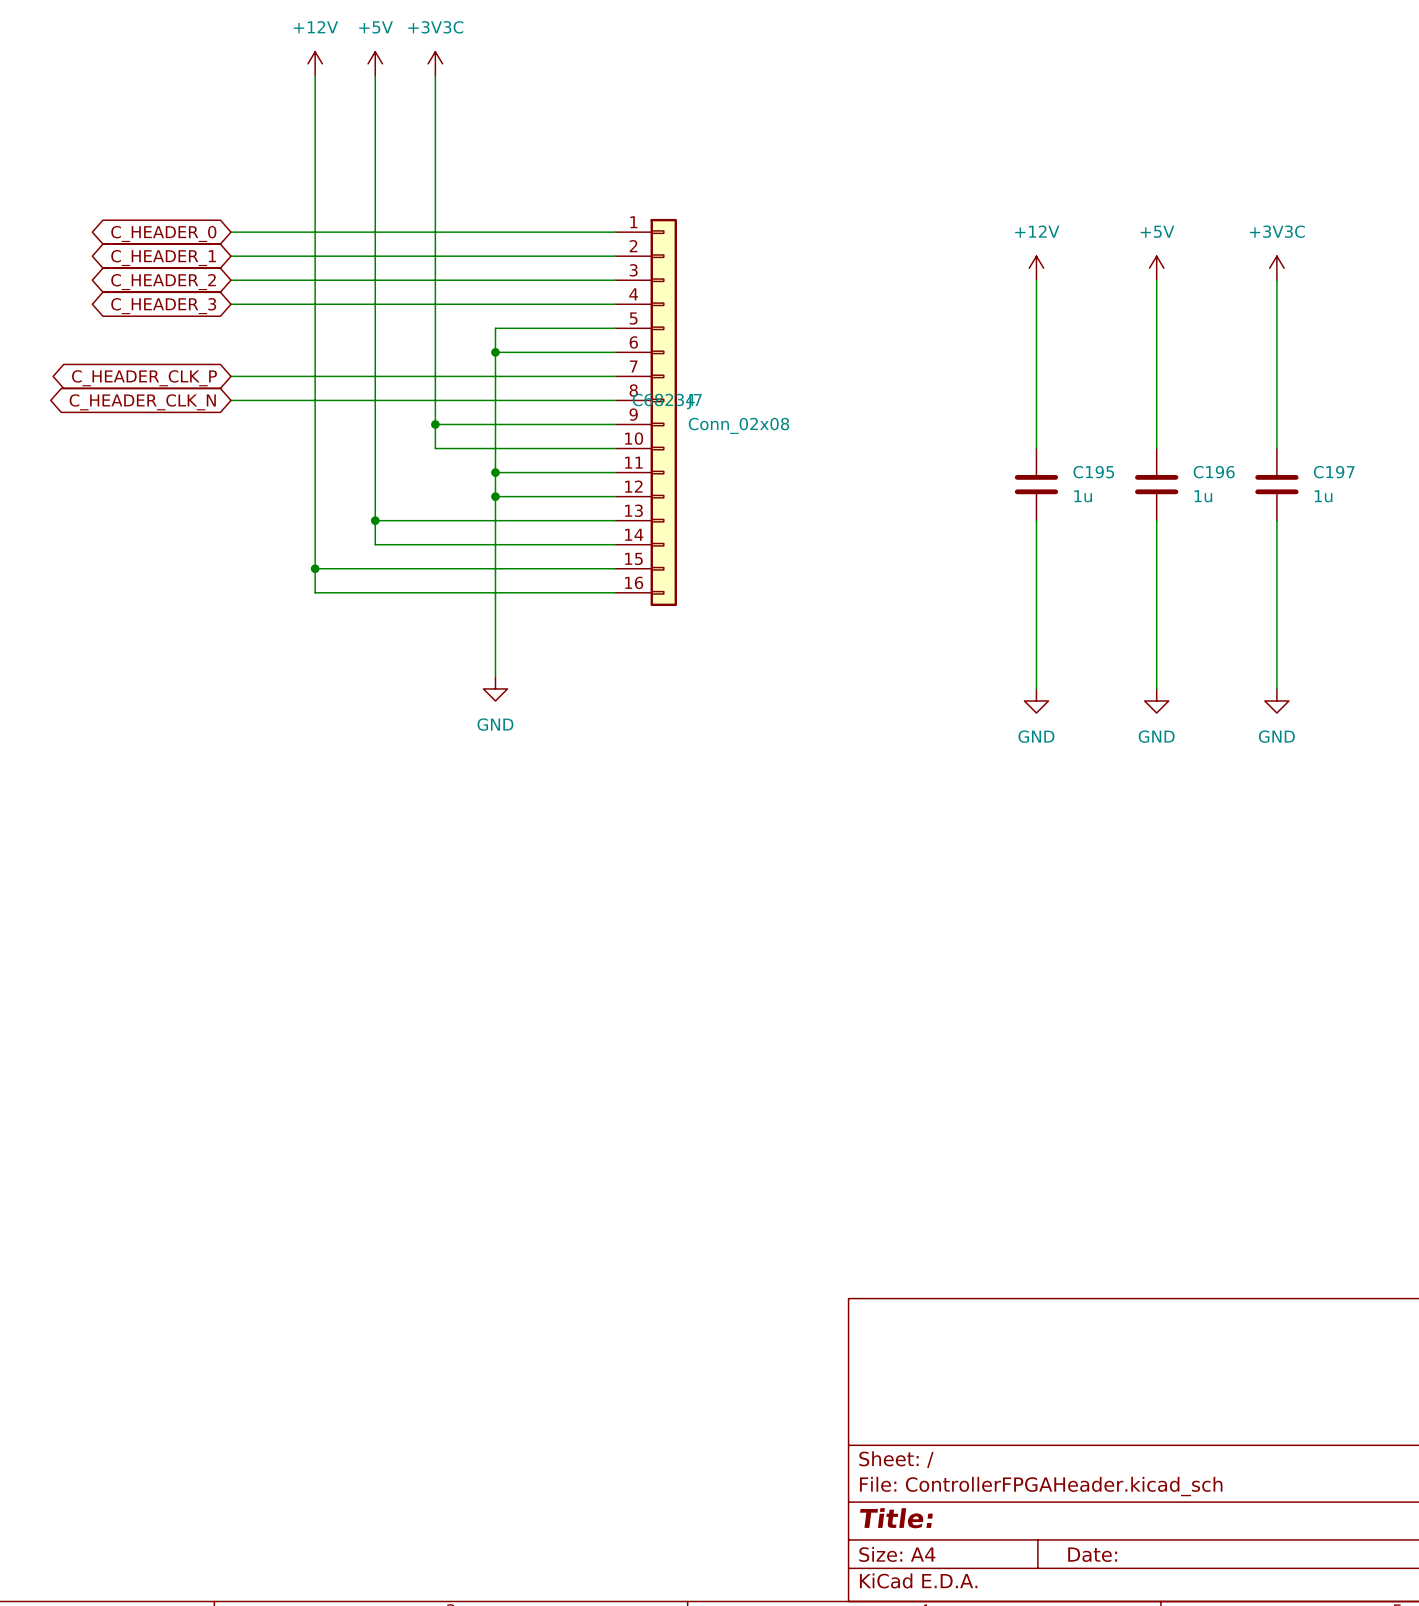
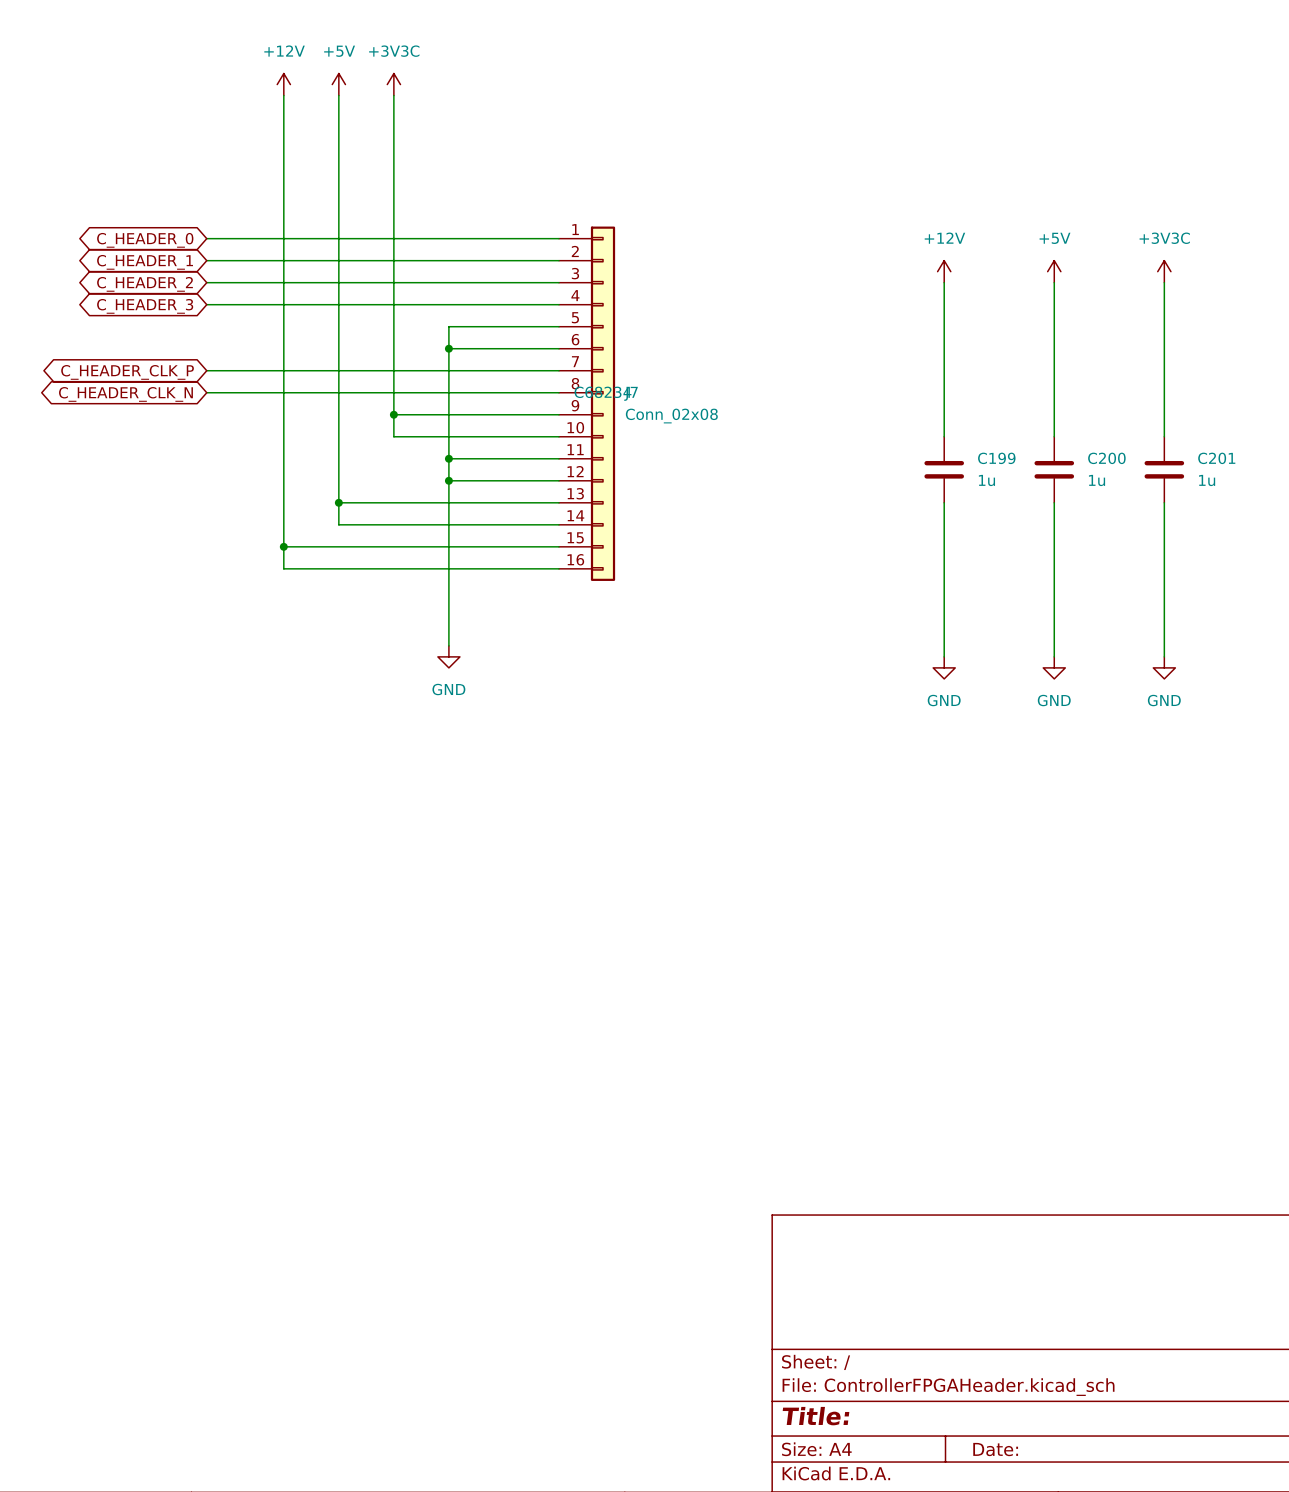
C195 name: C195 (1093, 472) -> C199 (996, 458)
C196 name: C196 (1214, 472) -> C200 (1106, 458)
C197 name: C197 (1334, 472) -> C201 (1216, 458)

